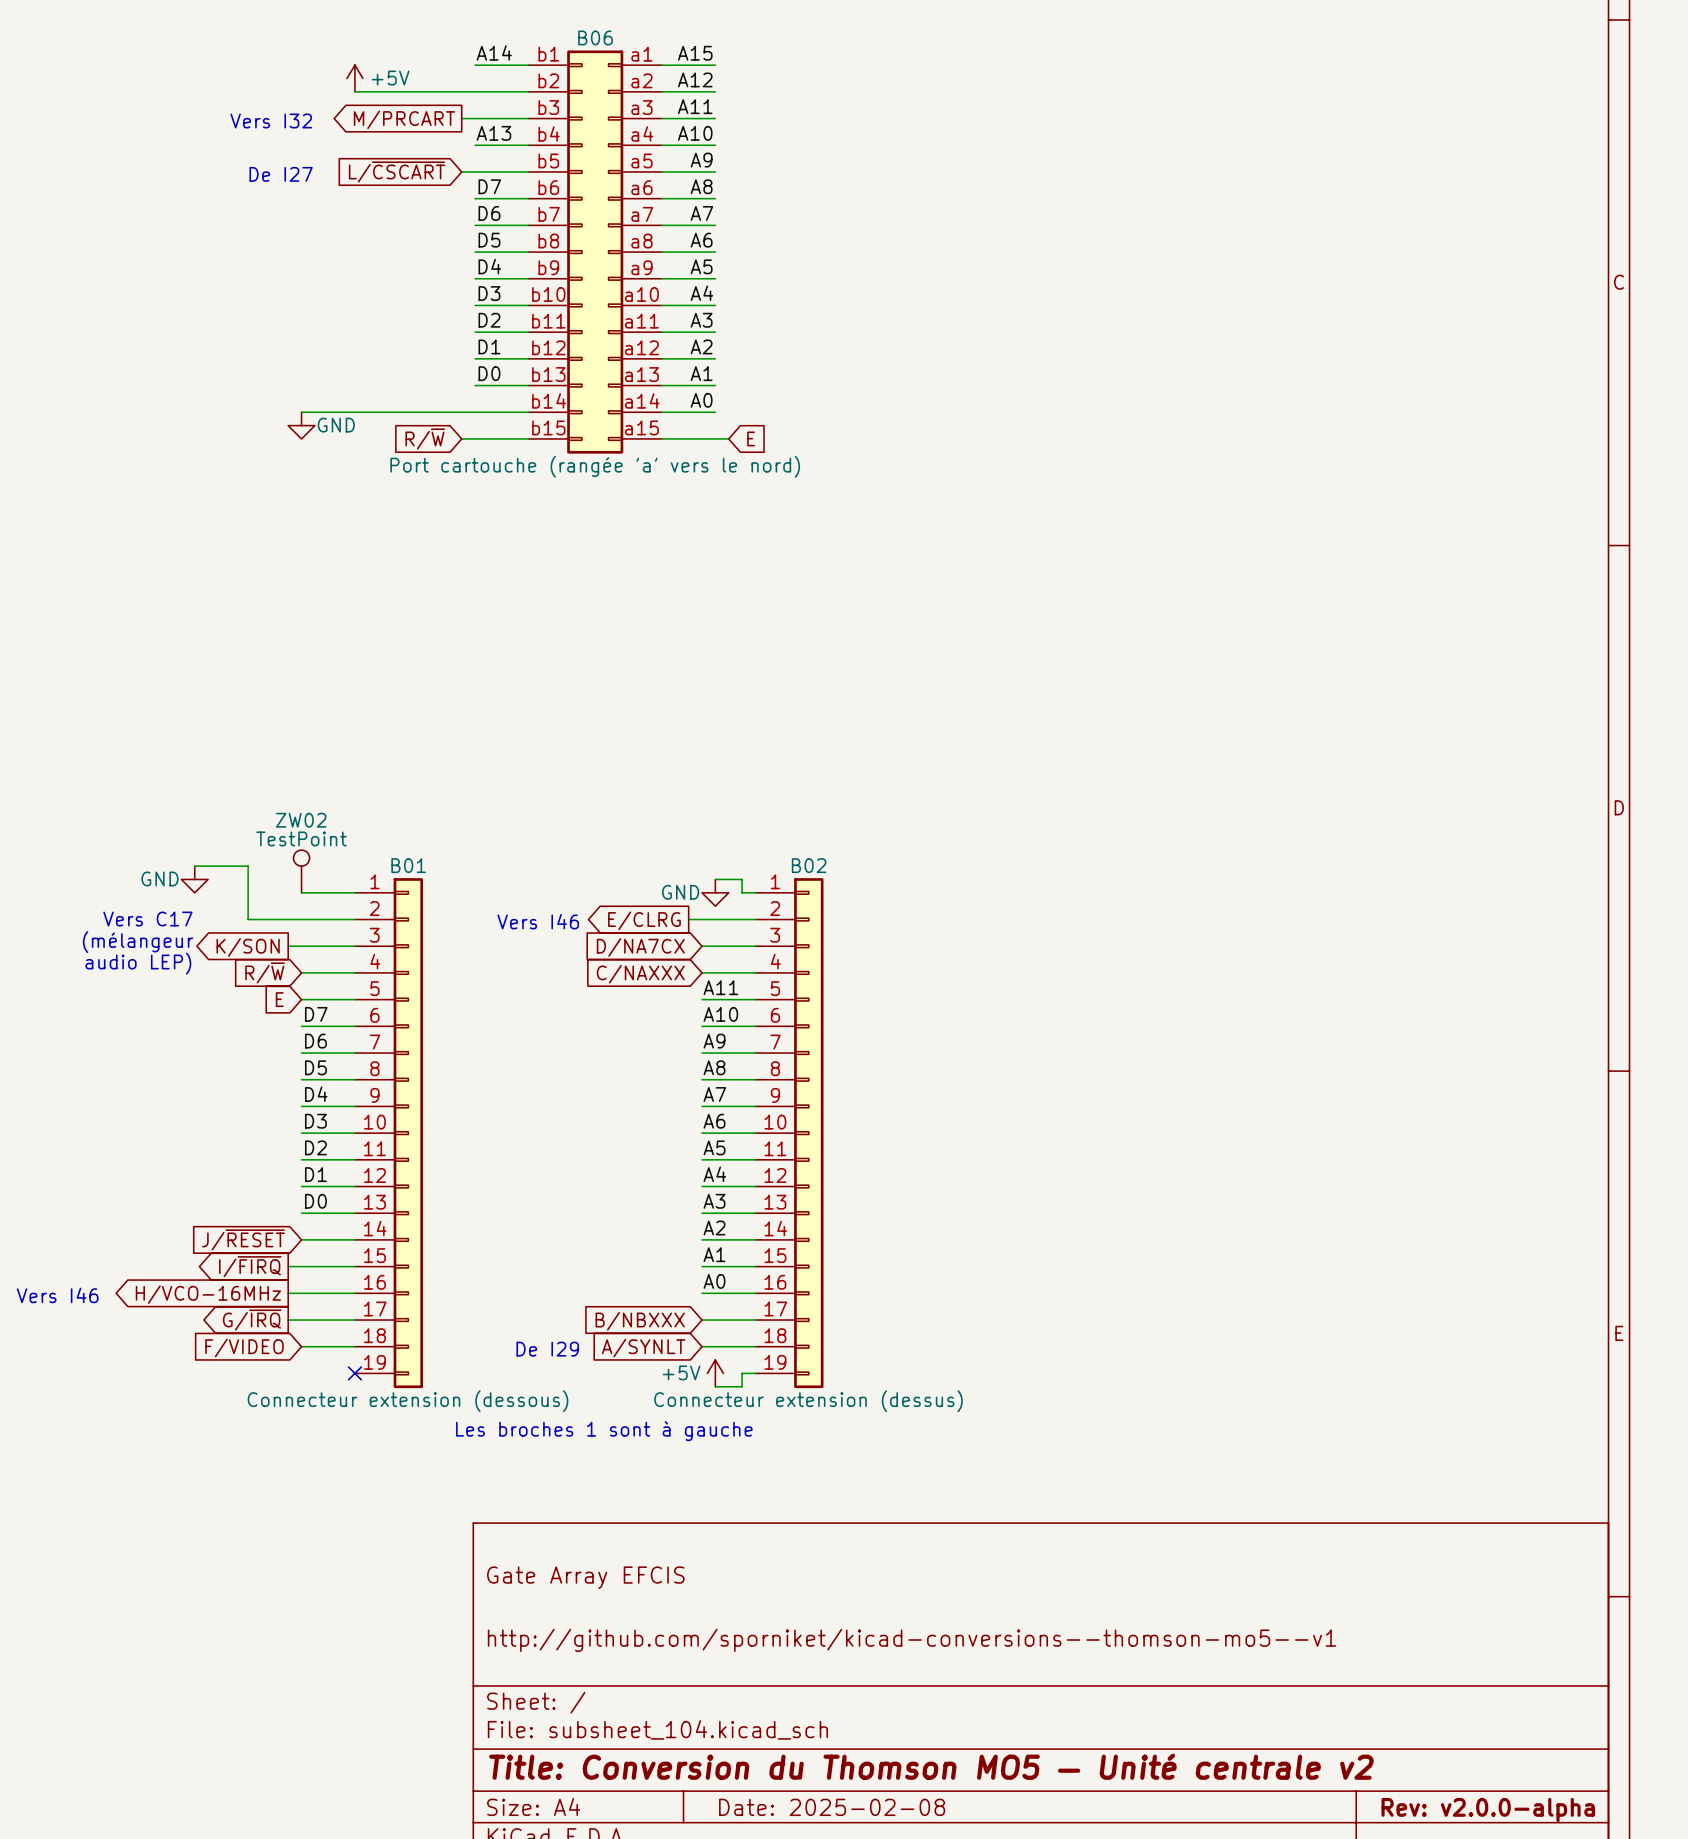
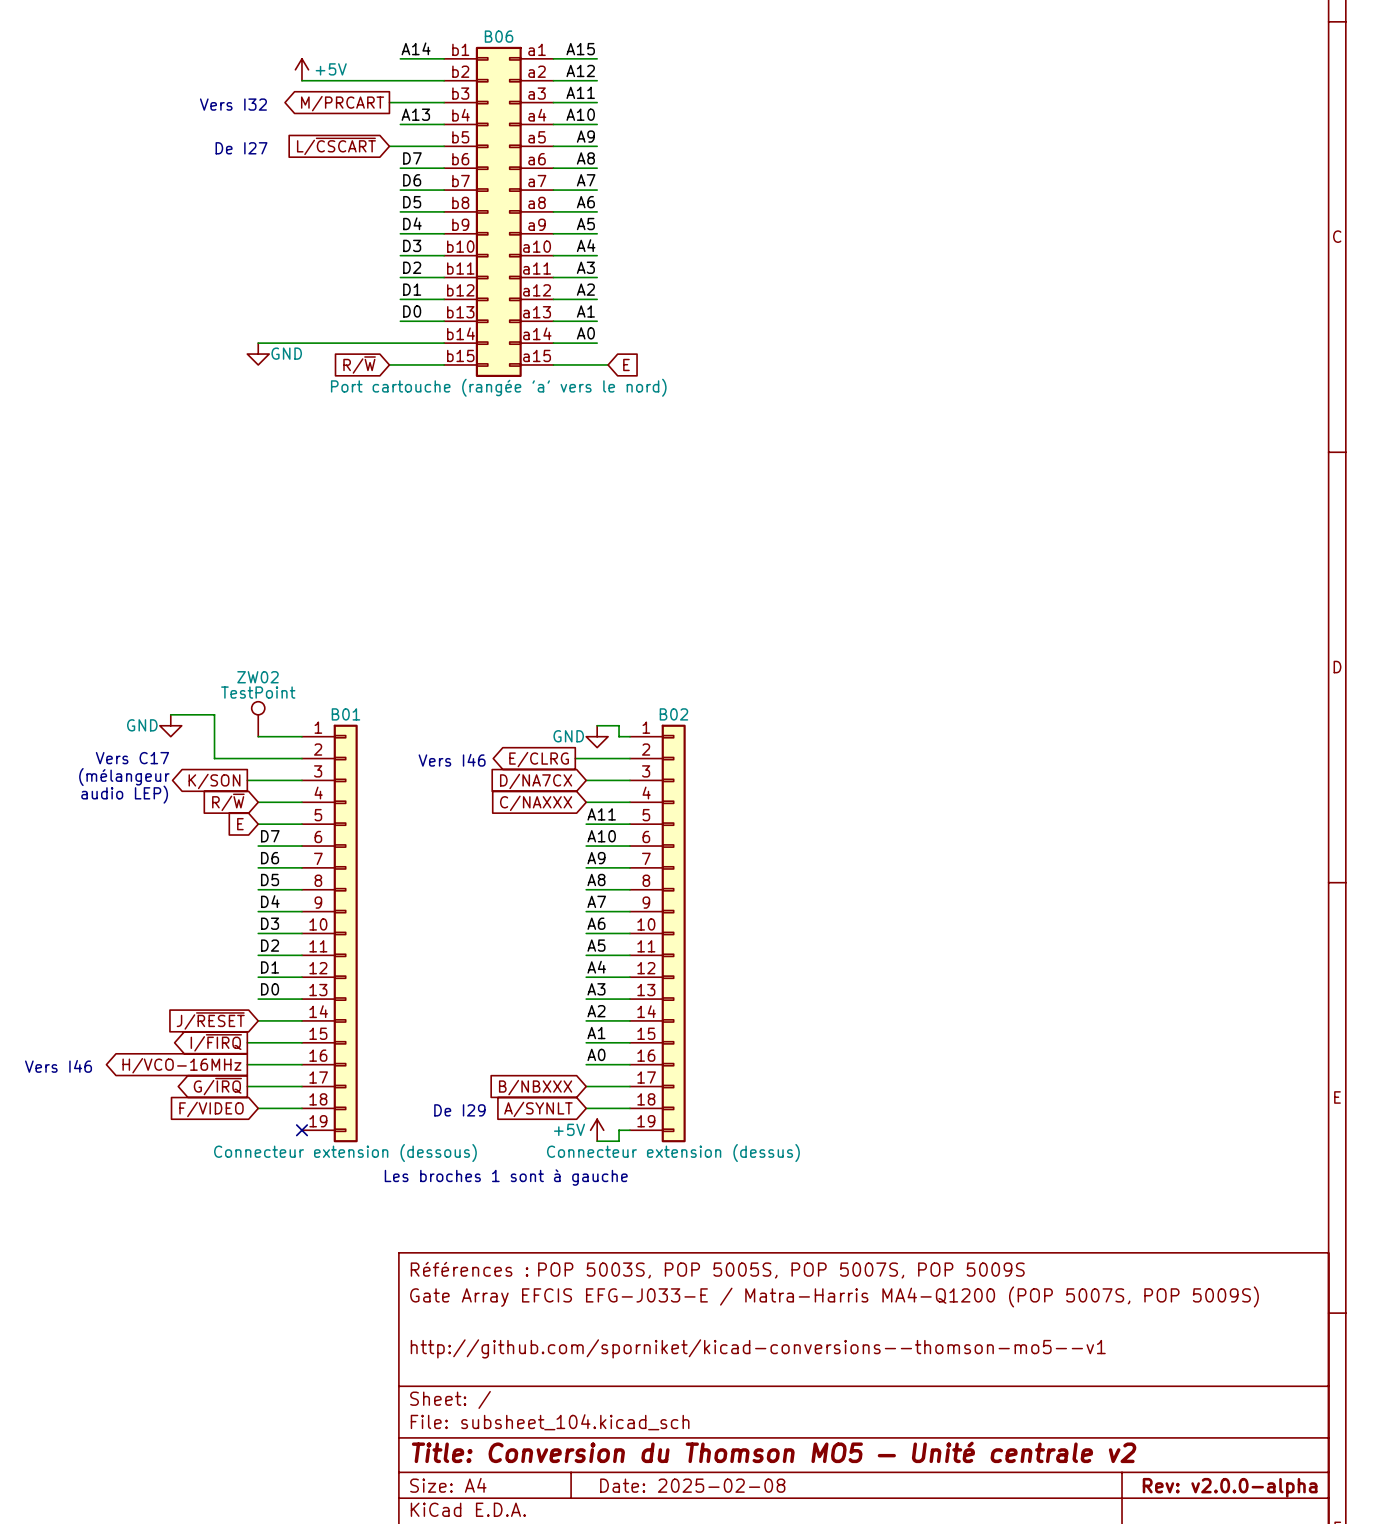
title block: none -> Références : POP 5003S, POP 5005S, POP 5007S, POP 5009S (717, 1270)
title block: Gate Array EFCIS (585, 1577) -> Gate Array EFCIS EFG-J033-E / Matra-Harris MA4-Q1200 (POP 5007S, POP 5009S) (834, 1296)

